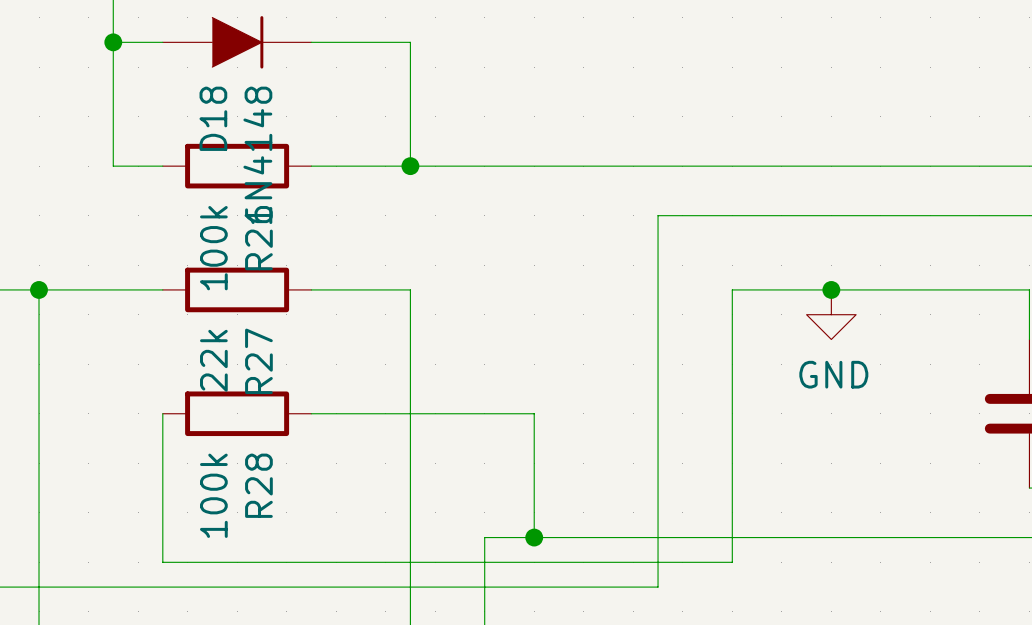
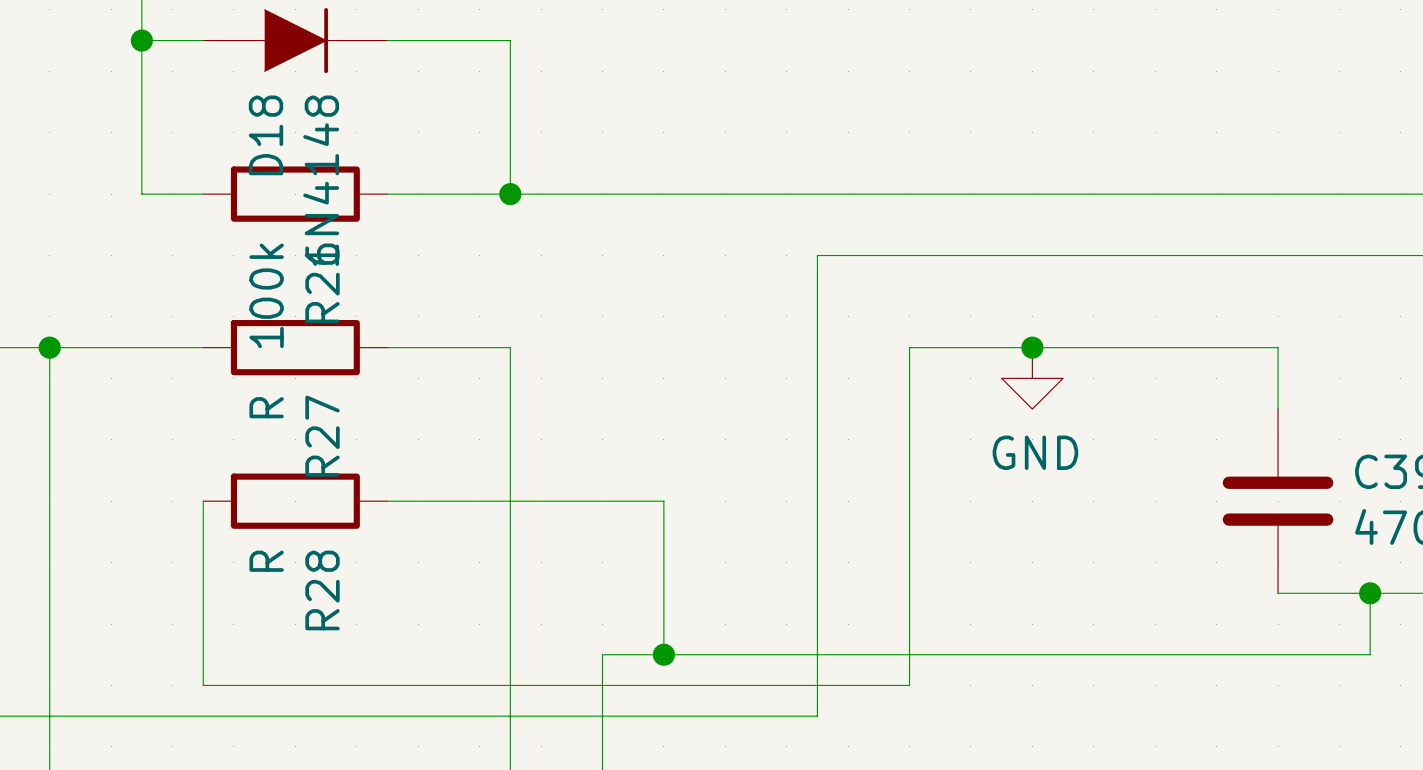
R27 value: 22k (213, 360) -> R (266, 407)
R28 value: 100k (213, 495) -> R (266, 561)

